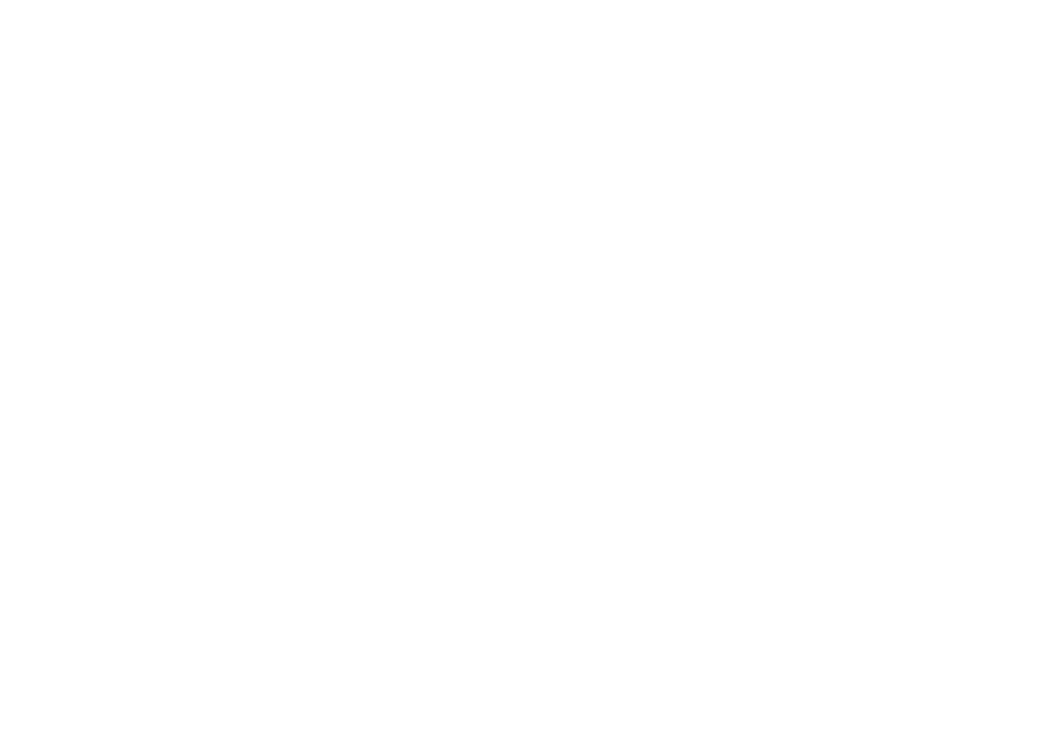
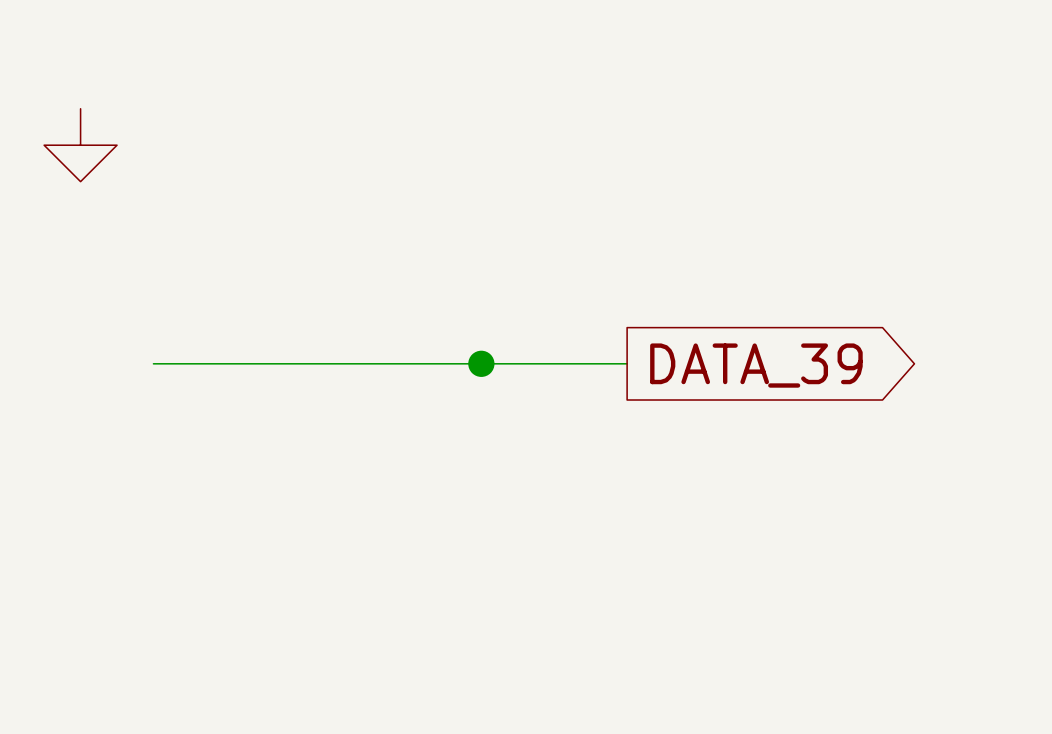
power symbol: none -> (80, 145)
wire: none -> (153, 363) (627, 363)
junction: none -> (481, 363)
global label: none -> DATA_39 (756, 365)

